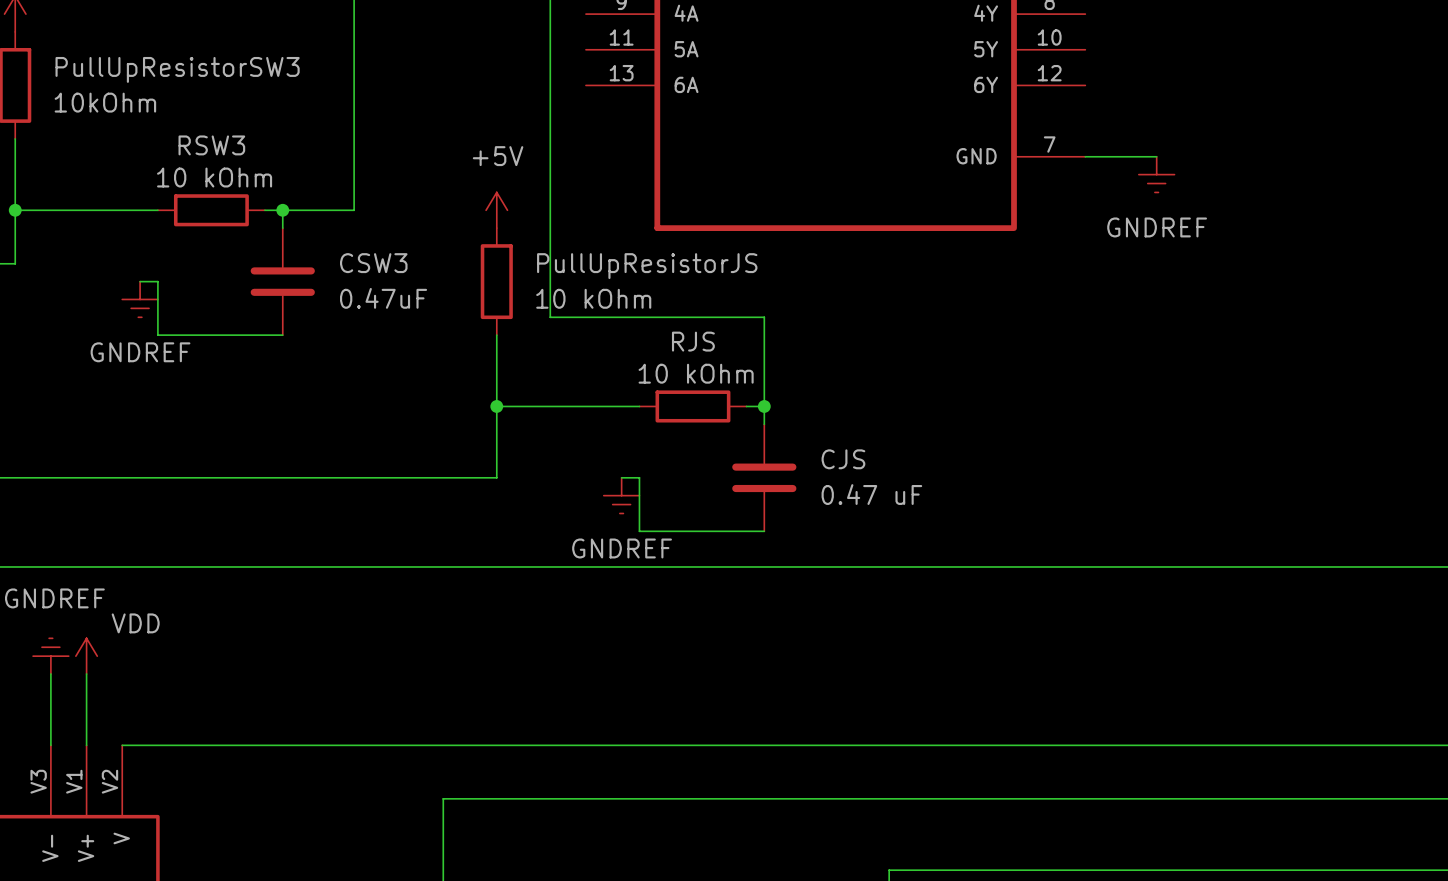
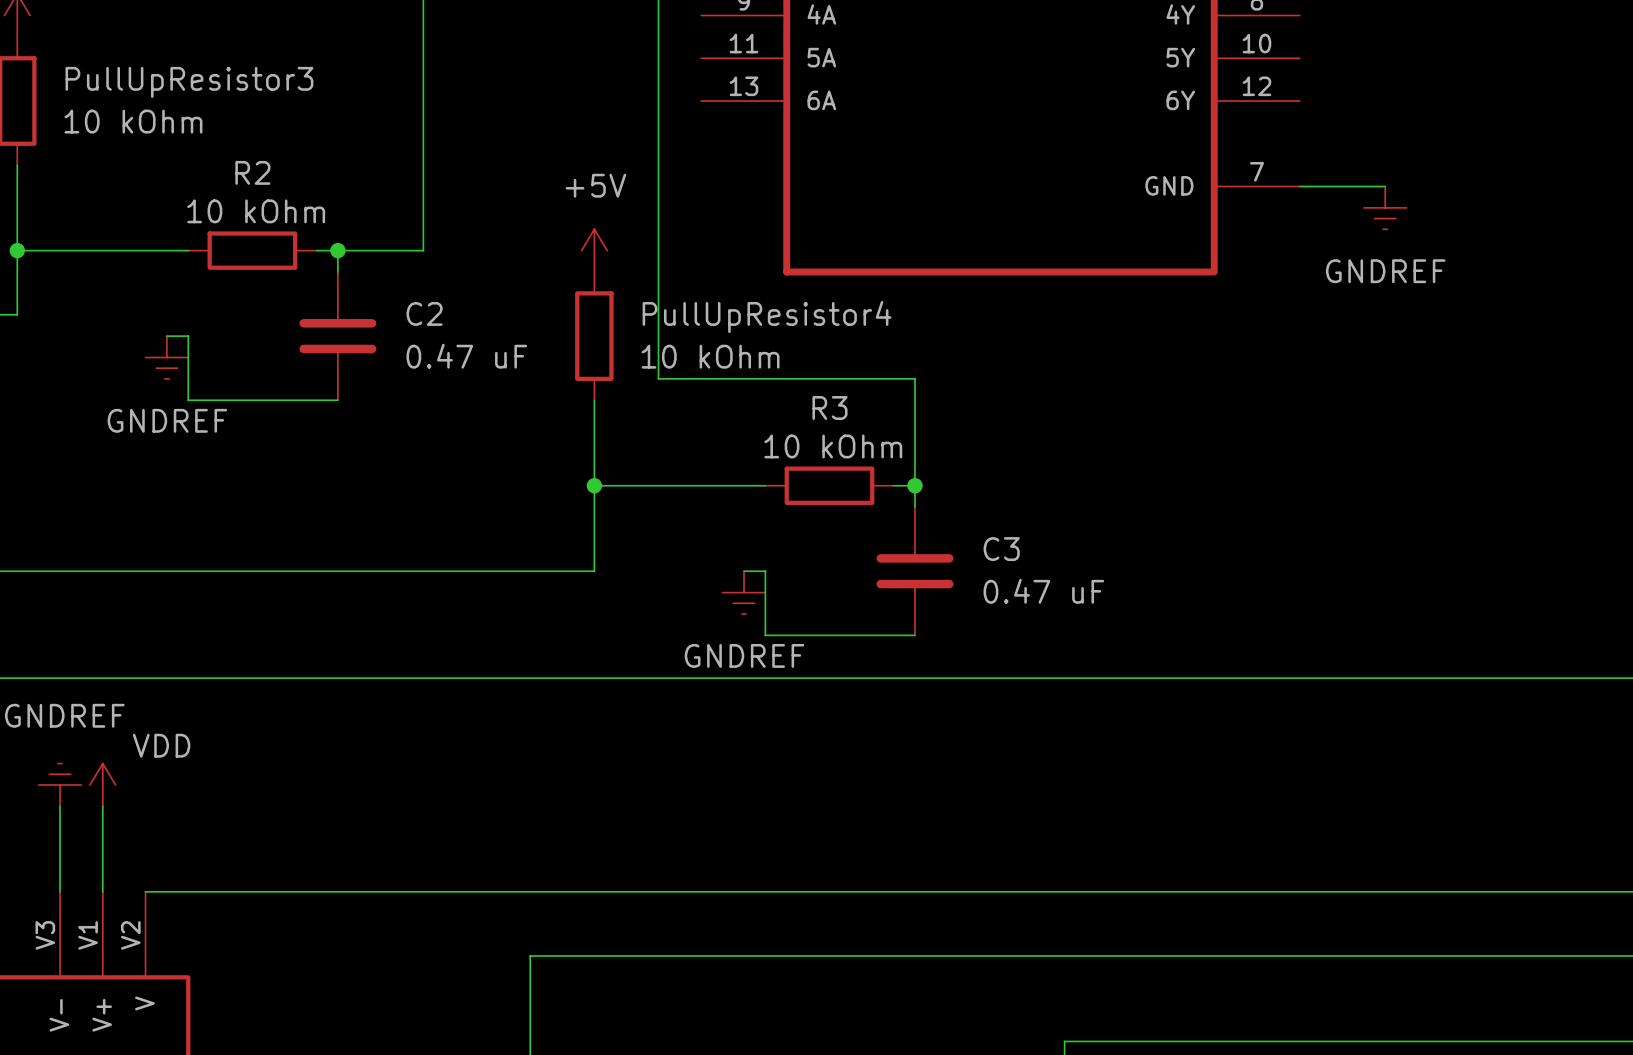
PullUpResistorSW3 name: PullUpResistorSW3 (177, 69) -> PullUpResistor3 (189, 82)
PullUpResistorSW3 value: 10kOhm (105, 102) -> 10 kOhm (133, 121)
RSW3 name: RSW3 (211, 145) -> R2 (252, 172)
CSW3 name: CSW3 (373, 263) -> C2 (424, 313)
PullUpResistorJS name: PullUpResistorJS (647, 266) -> PullUpResistor4 (767, 317)
CSW3 value: 0.47uF (383, 298) -> 0.47 uF (466, 356)
RJS name: RJS (693, 341) -> R3 (830, 408)
CJS name: CJS (843, 459) -> C3 (1001, 549)

